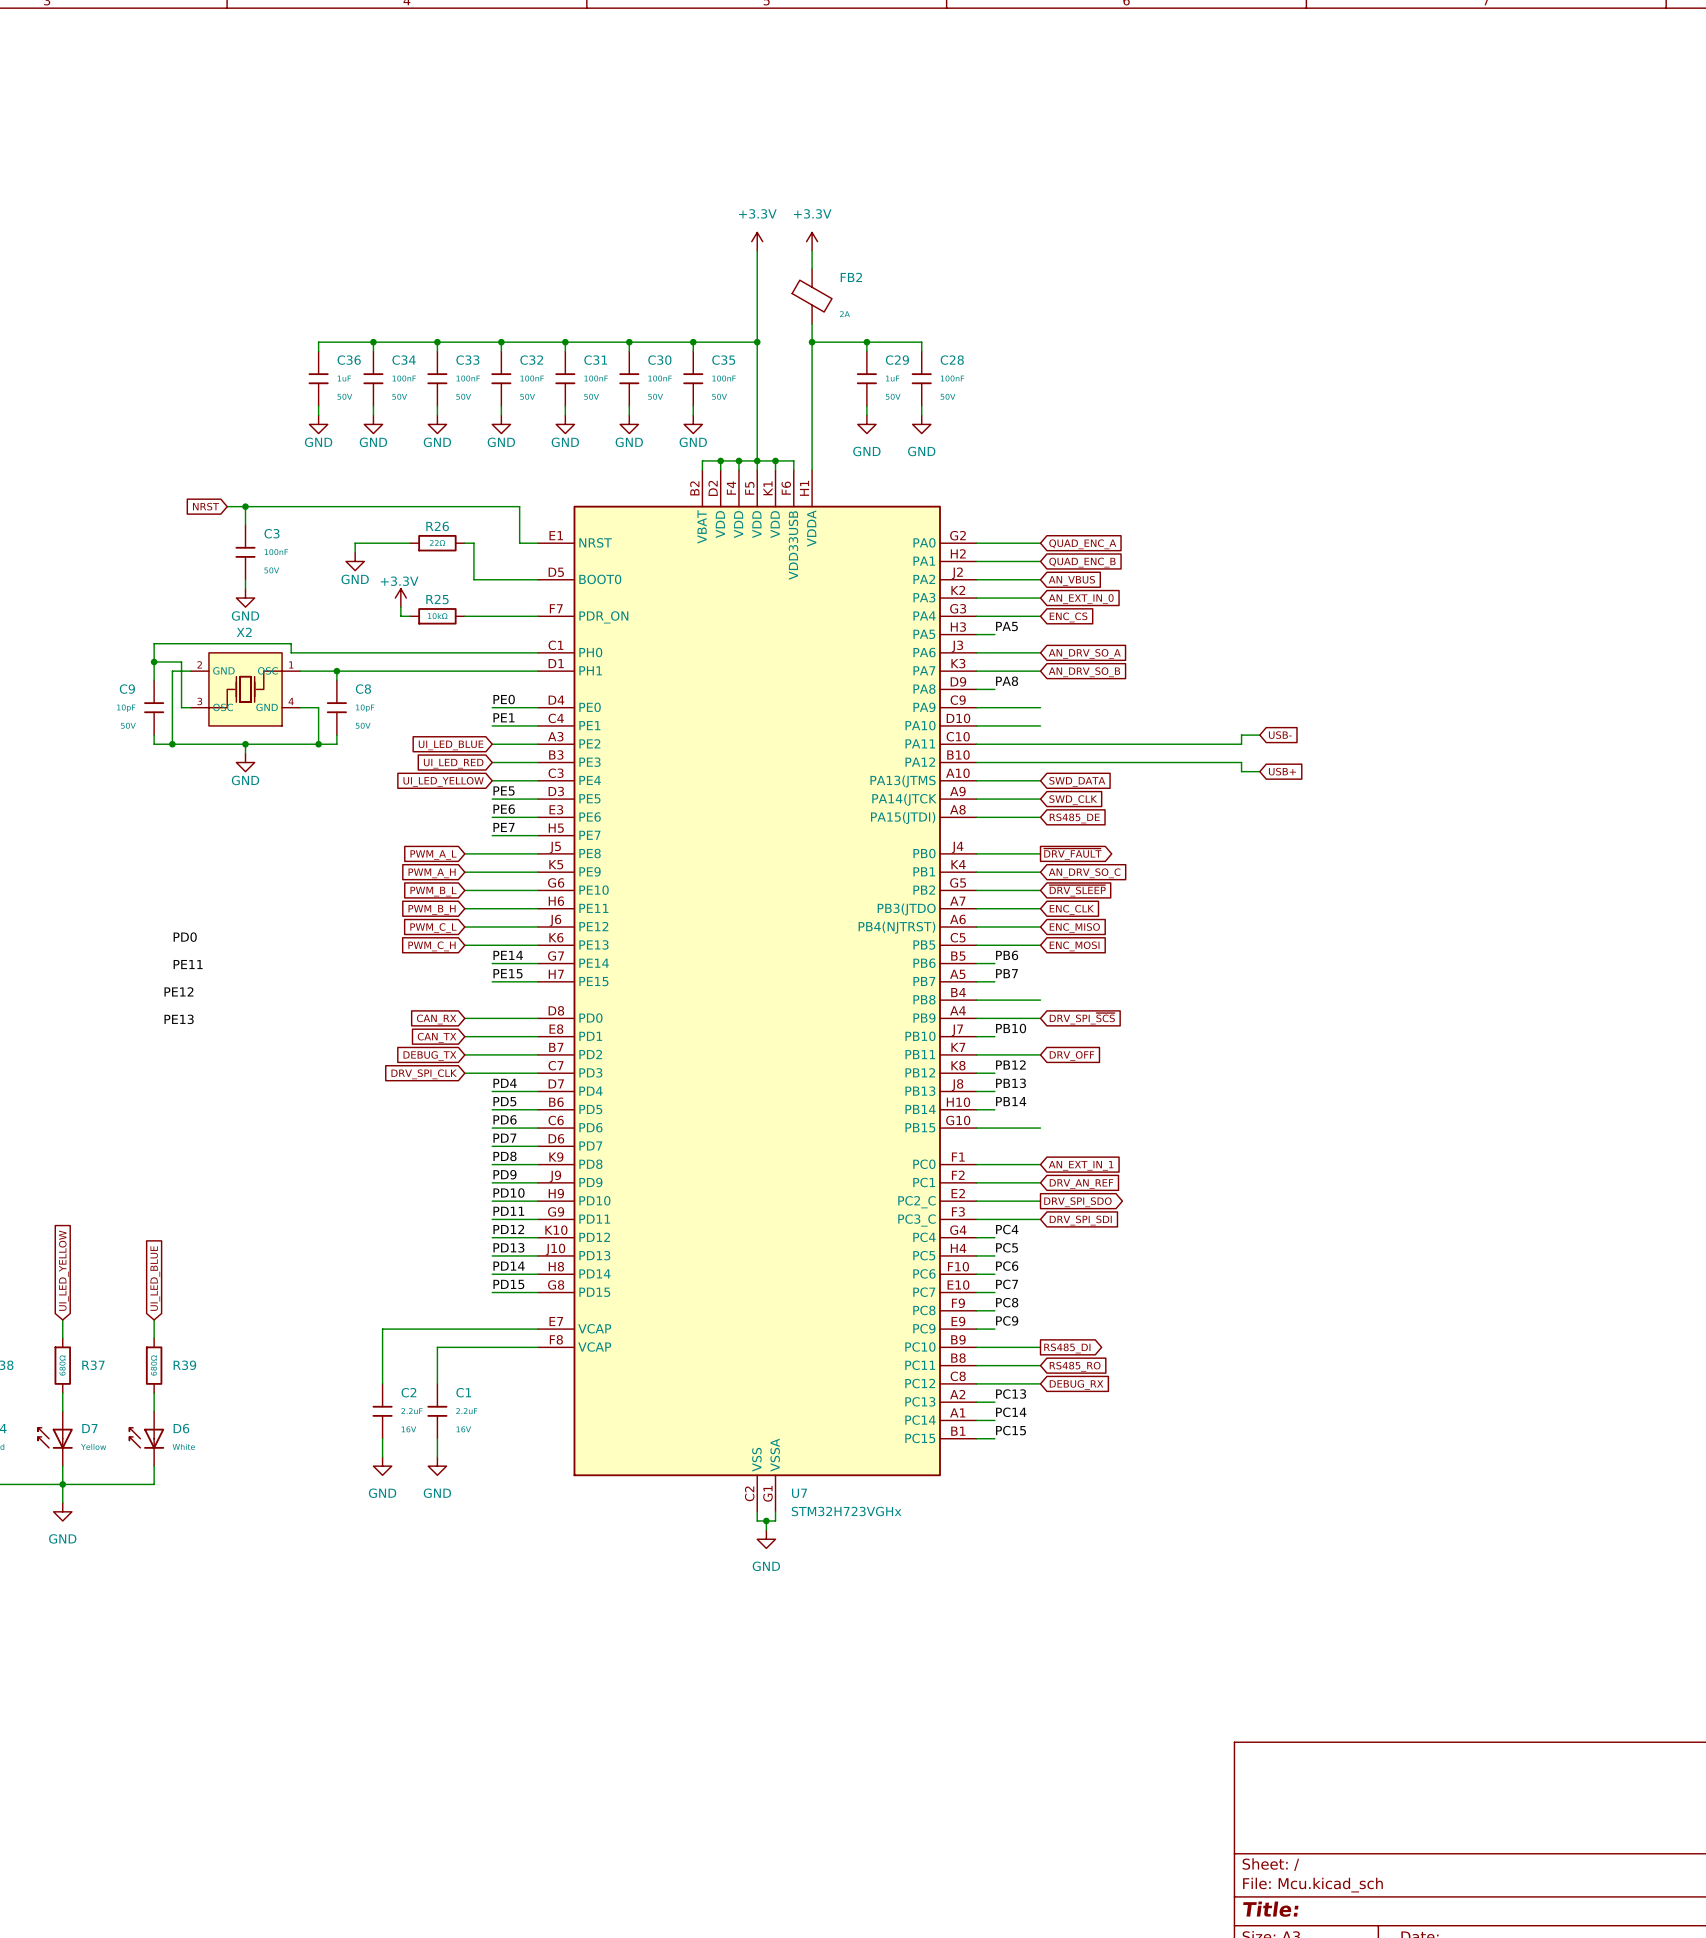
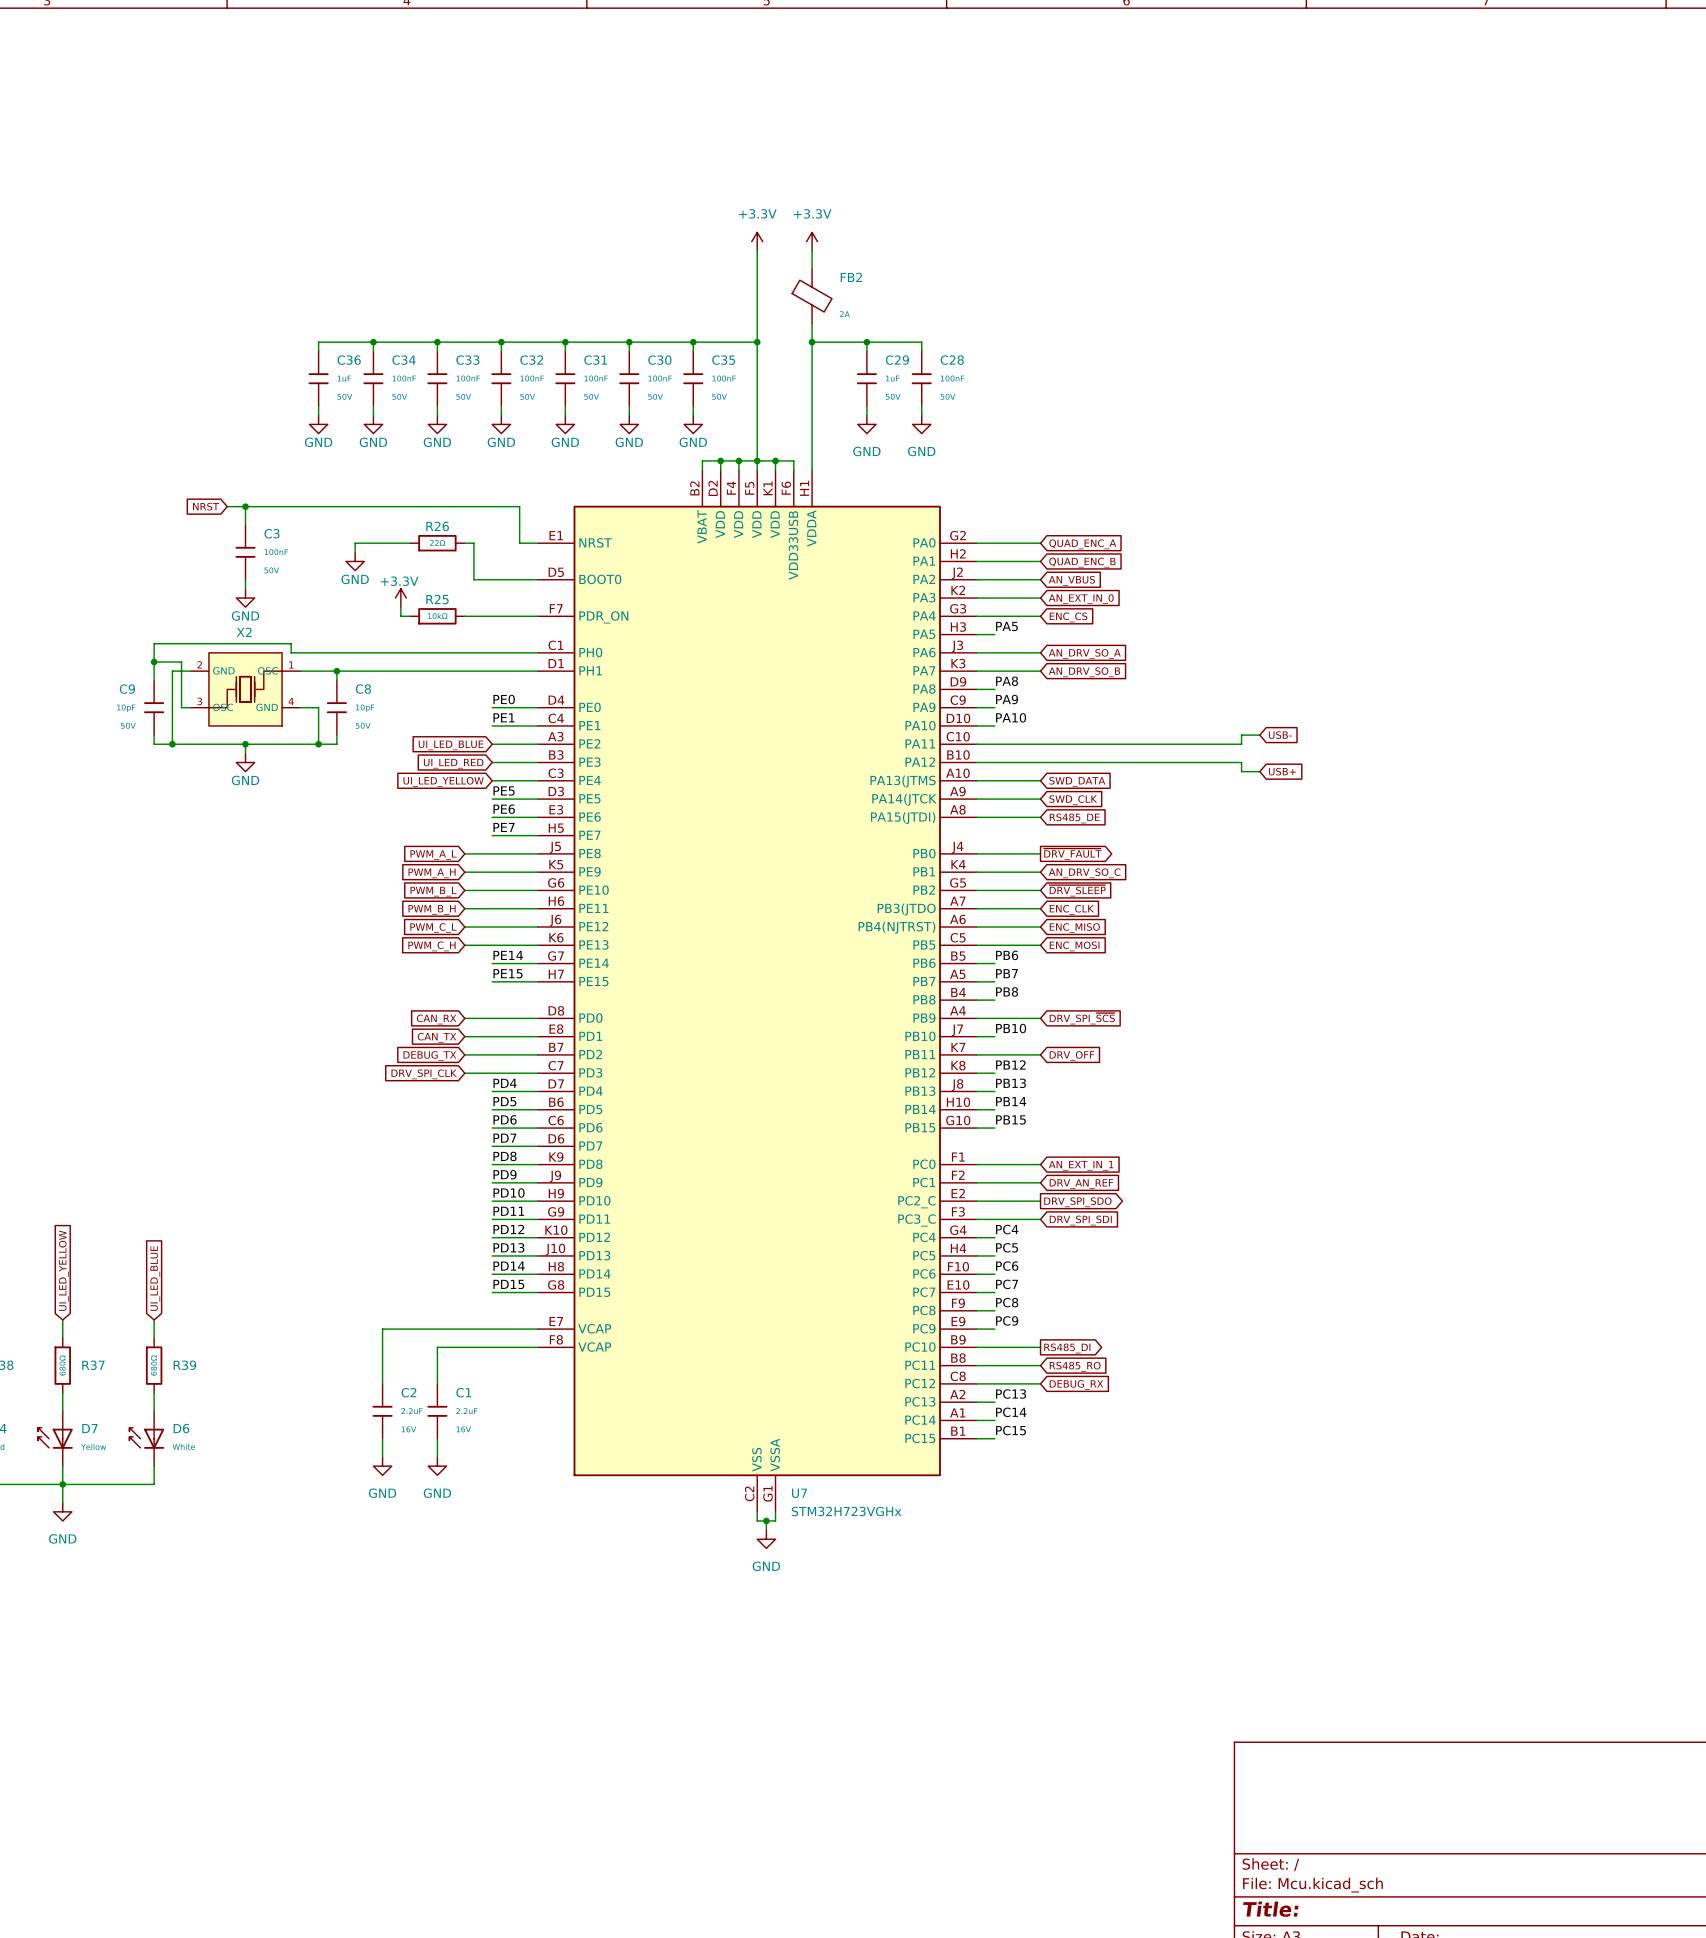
label: none -> PA9 (1007, 699)
wire: (994, 707) (1040, 707) -> none
label: none -> PA10 (1011, 717)
wire: (994, 725) (1040, 725) -> none
label: PD0 (185, 937) -> none
label: PE11 (188, 964) -> none
label: PE12 (178, 991) -> none
label: none -> PB8 (1007, 991)
wire: (994, 1000) (1040, 1000) -> none
label: PE13 (179, 1019) -> none
label: none -> PB15 (1010, 1119)
wire: (994, 1128) (1040, 1128) -> none

